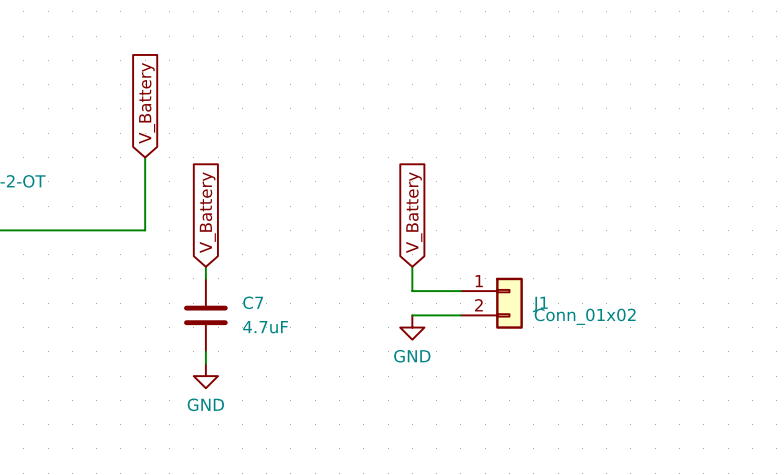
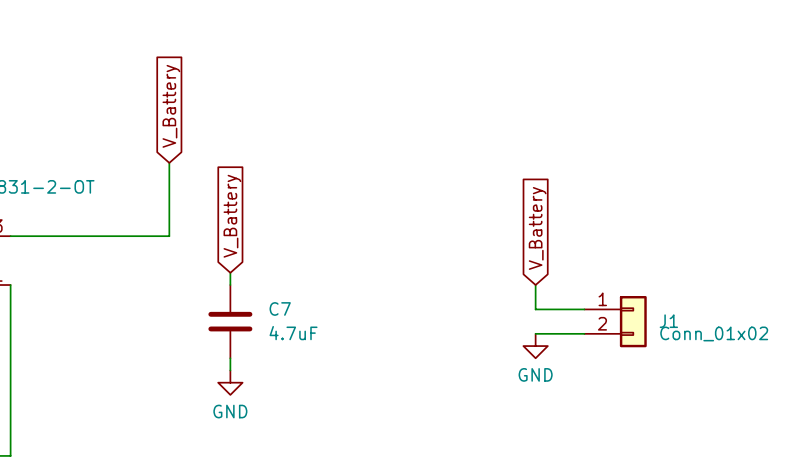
global label position: V_Battery (414, 212) -> V_Battery (537, 228)
wire: (412, 266) (412, 291) (460, 291) -> (535, 285) (535, 309) (584, 309)
J1 position: (491, 303) -> (615, 321)
wire: (412, 315) (460, 315) -> (535, 333) (584, 333)
power symbol position: GND (412, 327) -> GND (535, 346)

